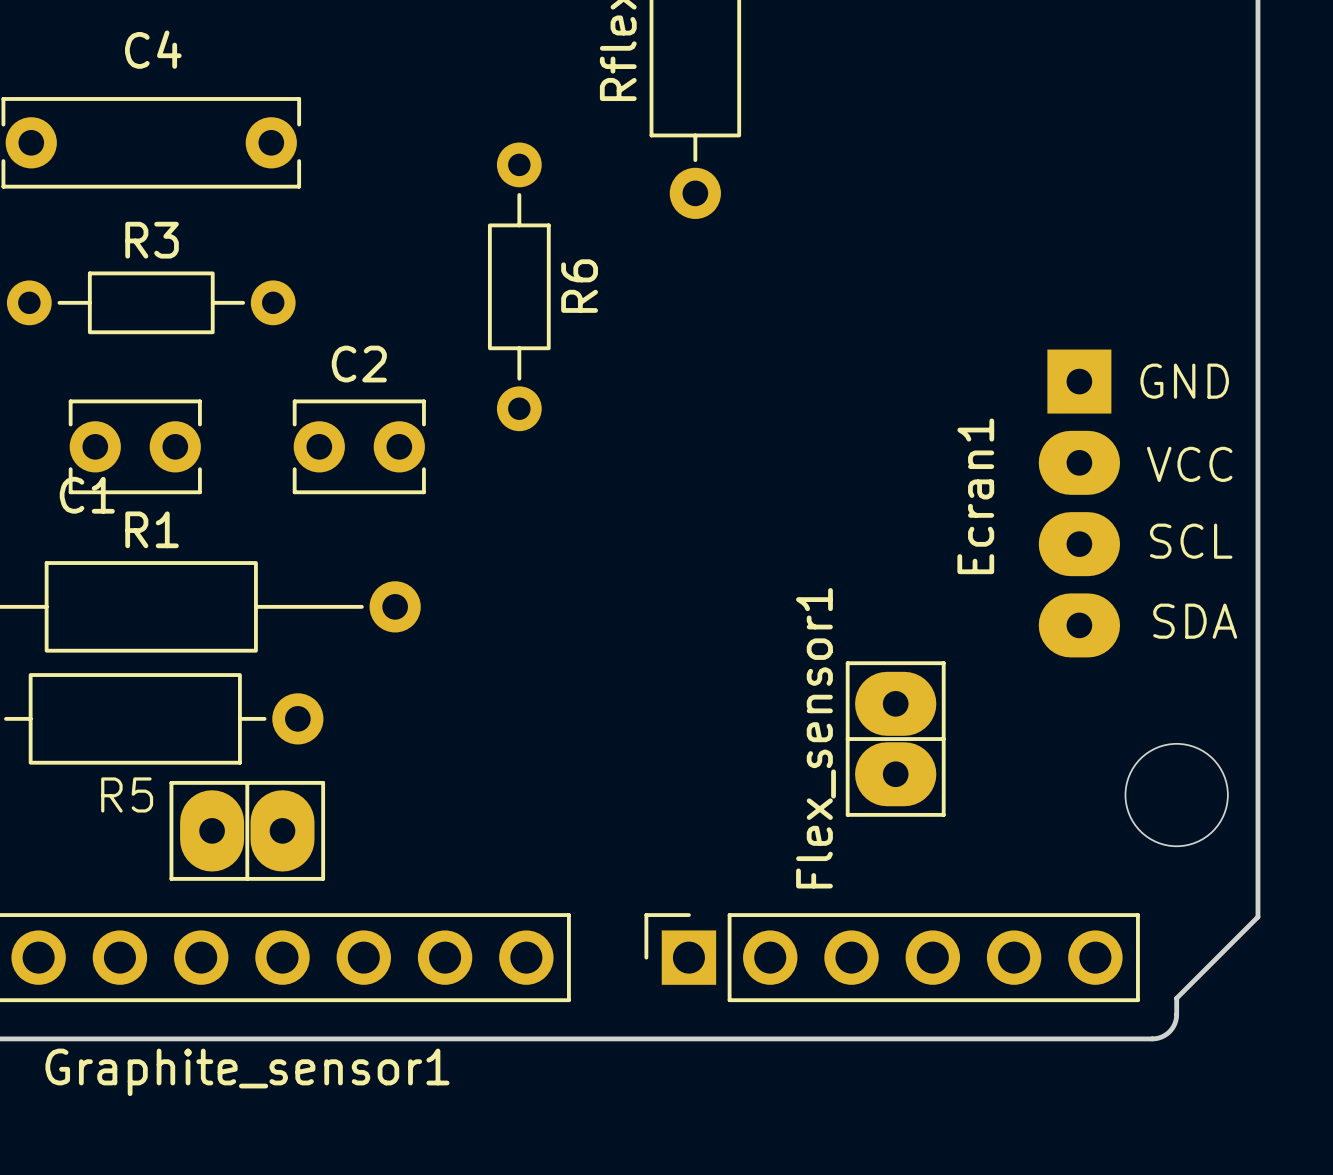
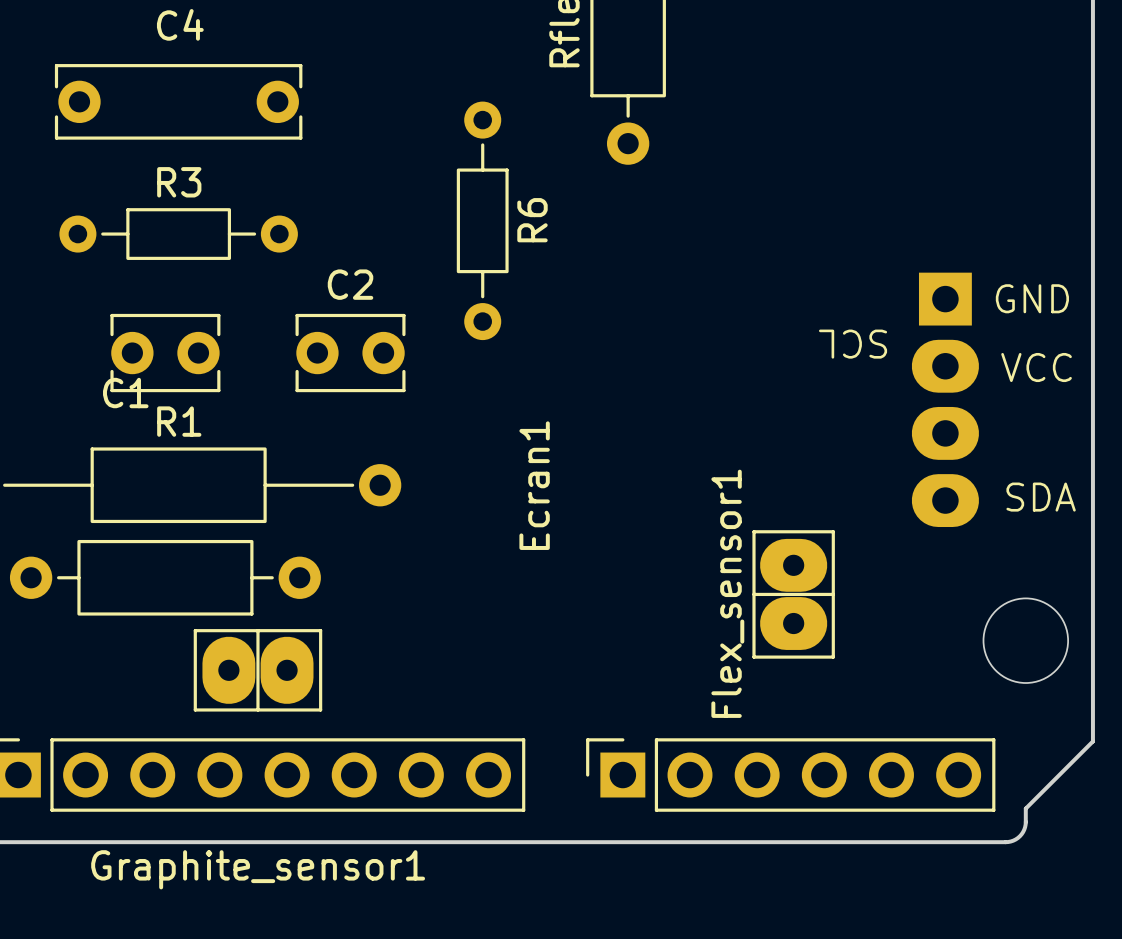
Ecran1 footprint: [1038, 349, 1121, 658] -> [911, 272, 980, 528]
text: none -> SCL (853, 344)
Ecran1 name position: Ecran1 (975, 496) -> Ecran1 (534, 485)
part text: R5 (127, 794) -> none

